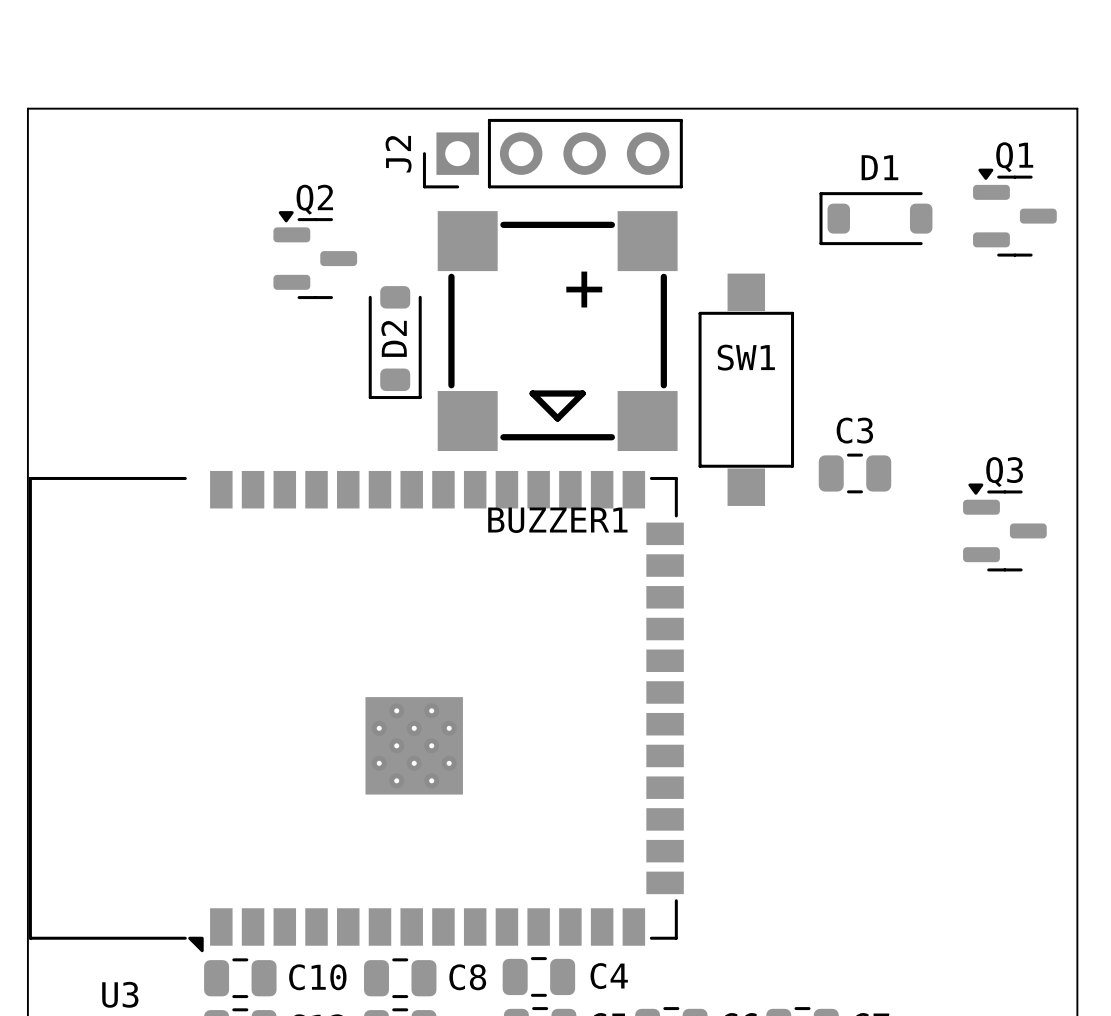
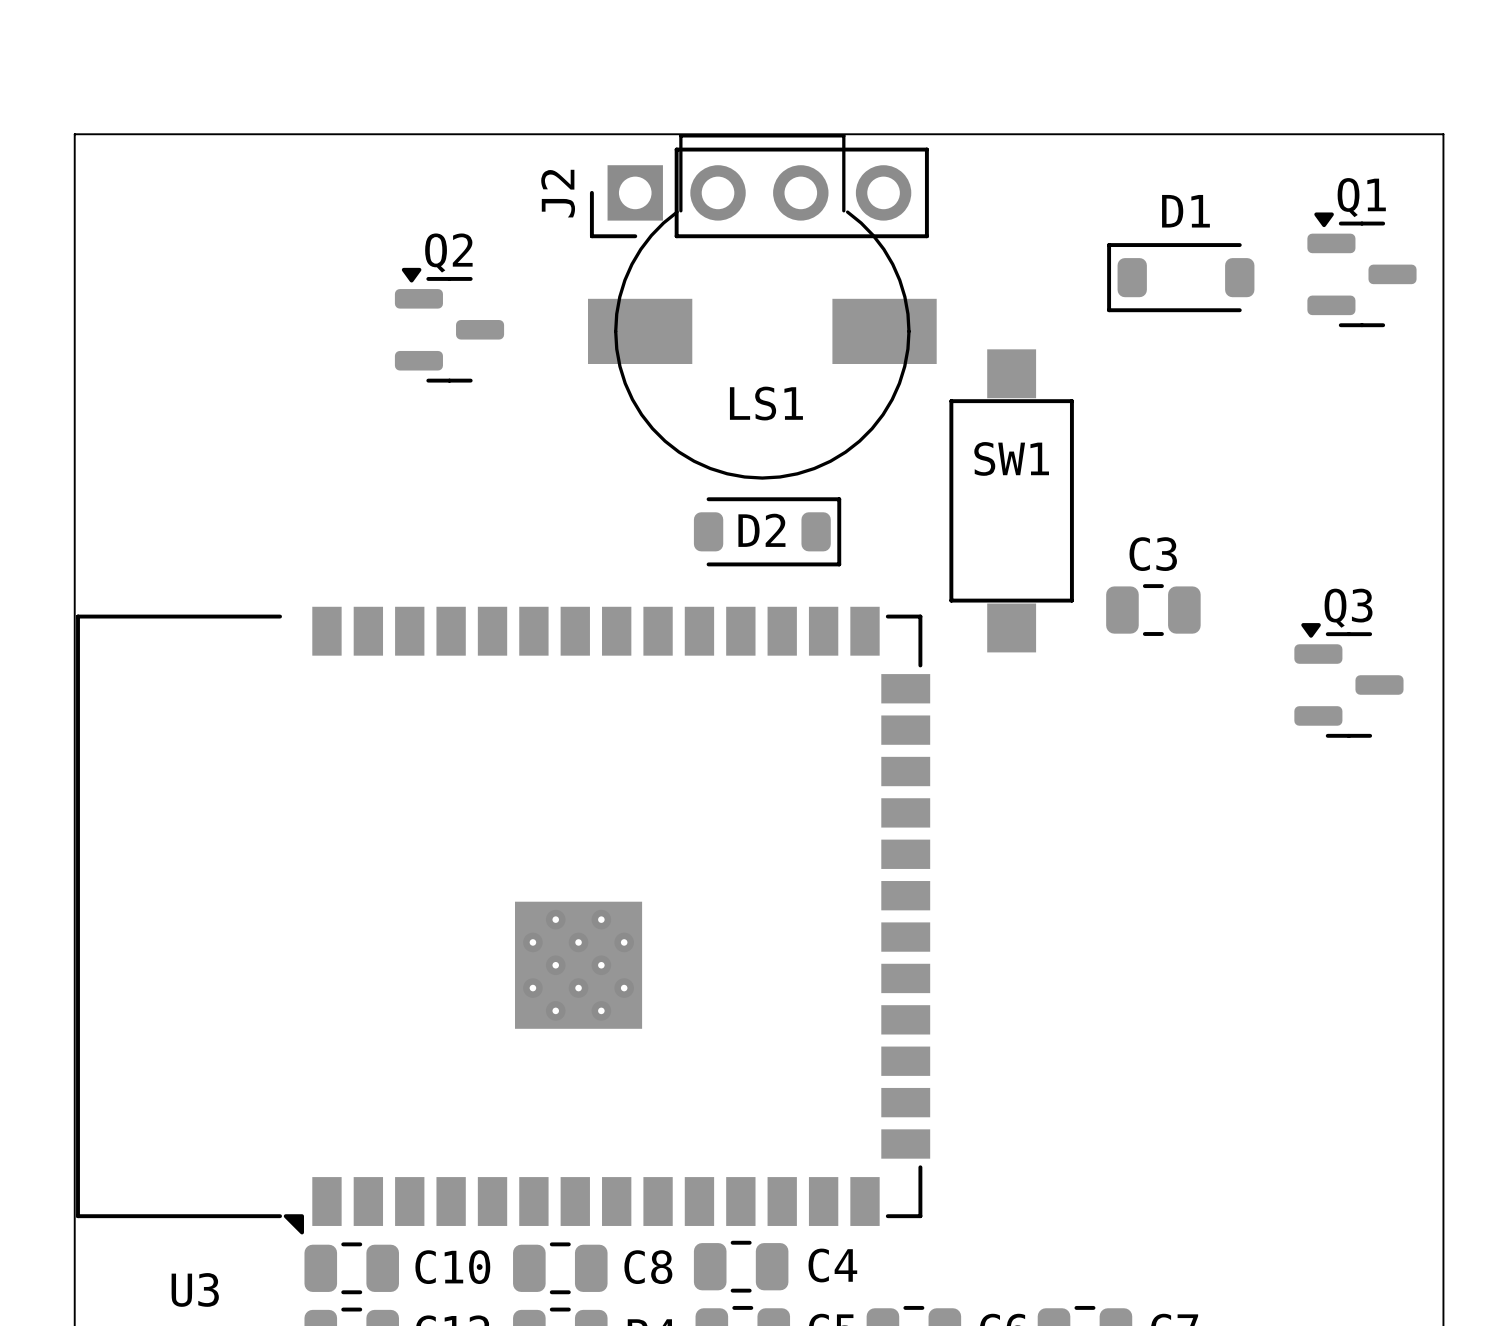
LS1: none -> (762, 306)
BUZZER1: (557, 331) -> none
D2 rotation: 0° (395, 342) -> 90° counterclockwise (767, 531)
D2 position: (395, 342) -> (767, 531)

